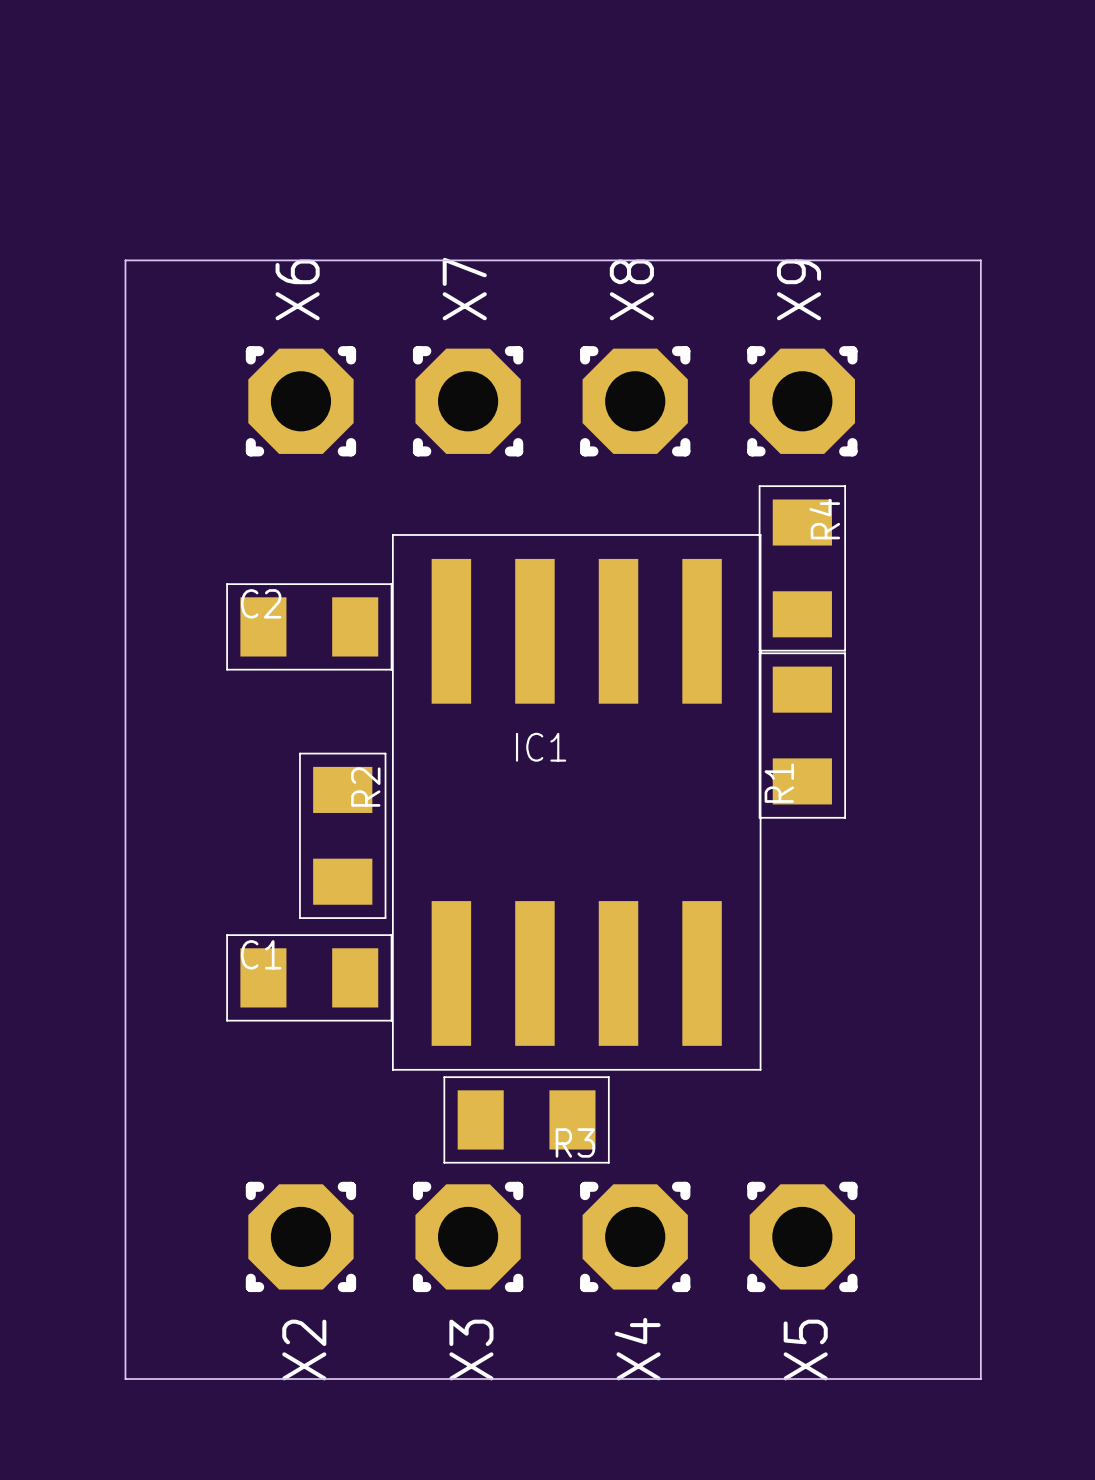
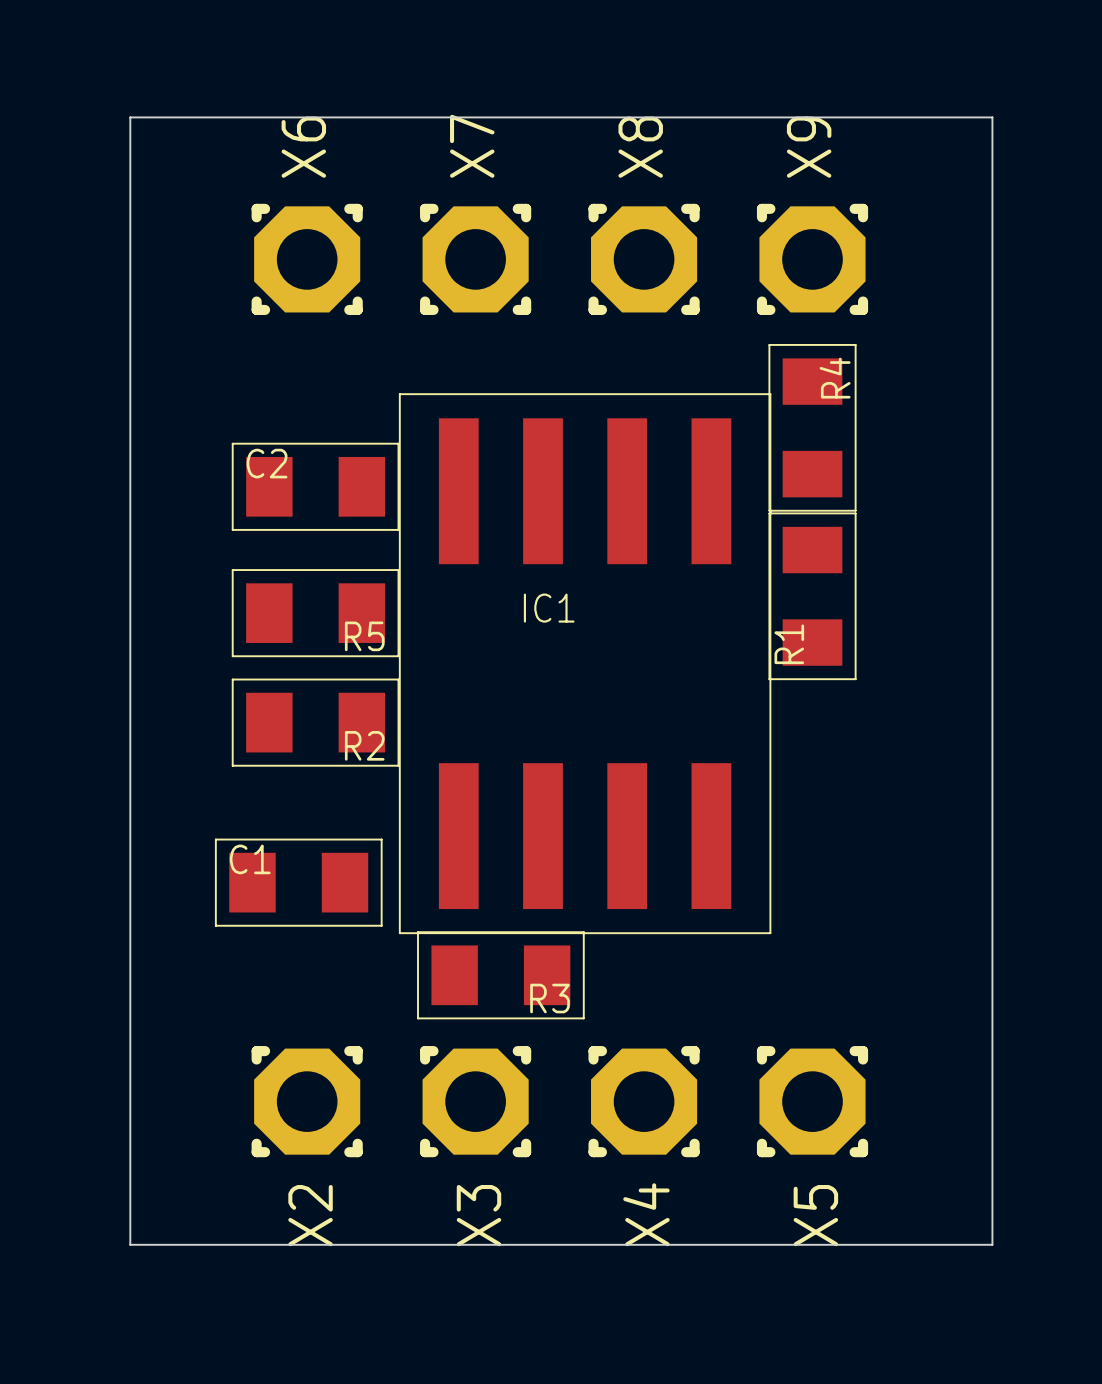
R5: none -> (315, 613)
R2 rotation: 0° (342, 835) -> 90° clockwise (315, 722)
C1 position: (309, 977) -> (298, 882)
R3 position: (526, 1119) -> (500, 975)

